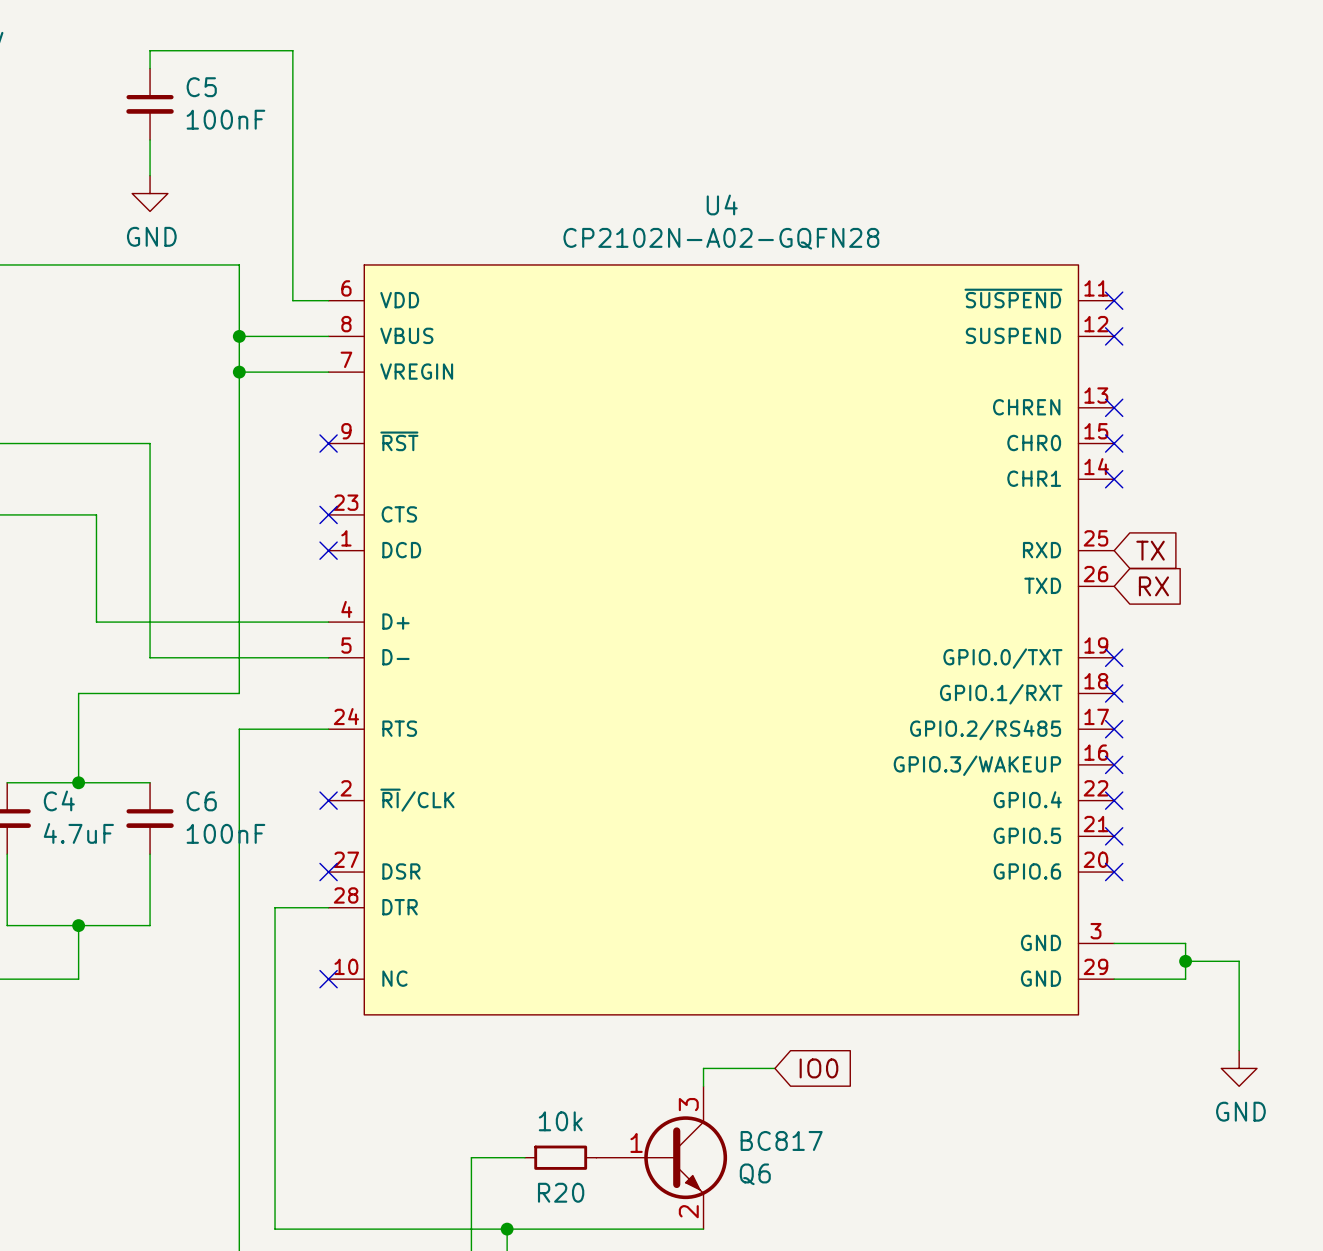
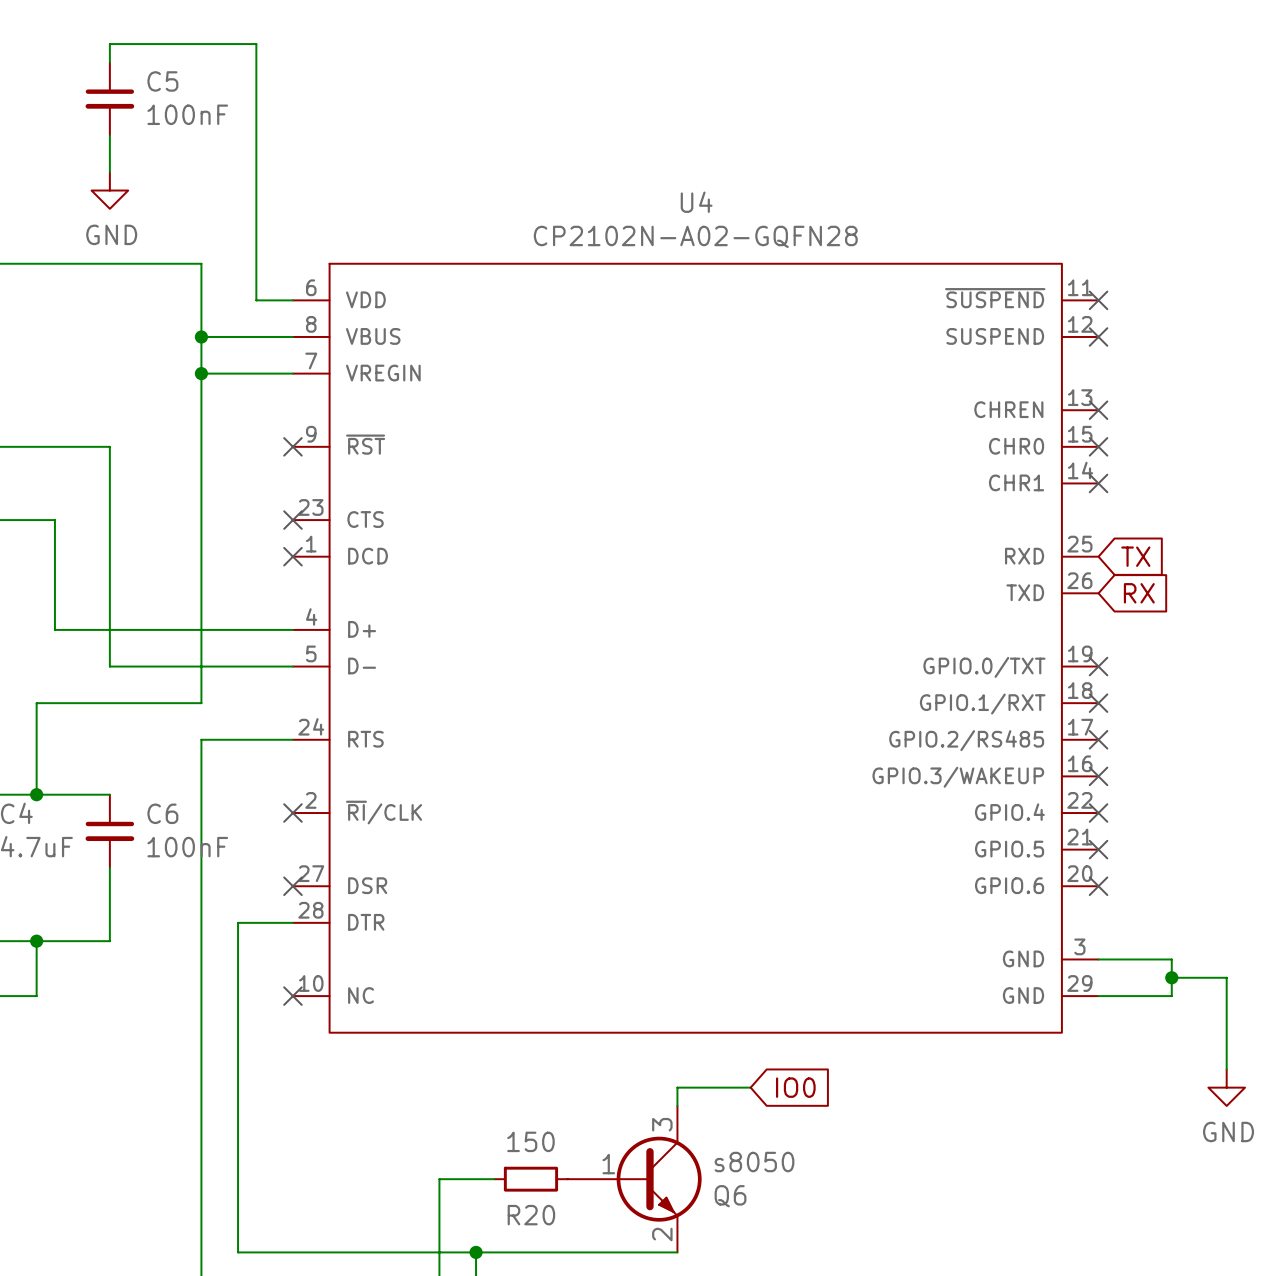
R20 value: 10k (560, 1121) -> 150 (530, 1141)
Q6 value: BC817 (781, 1140) -> s8050 (754, 1162)

